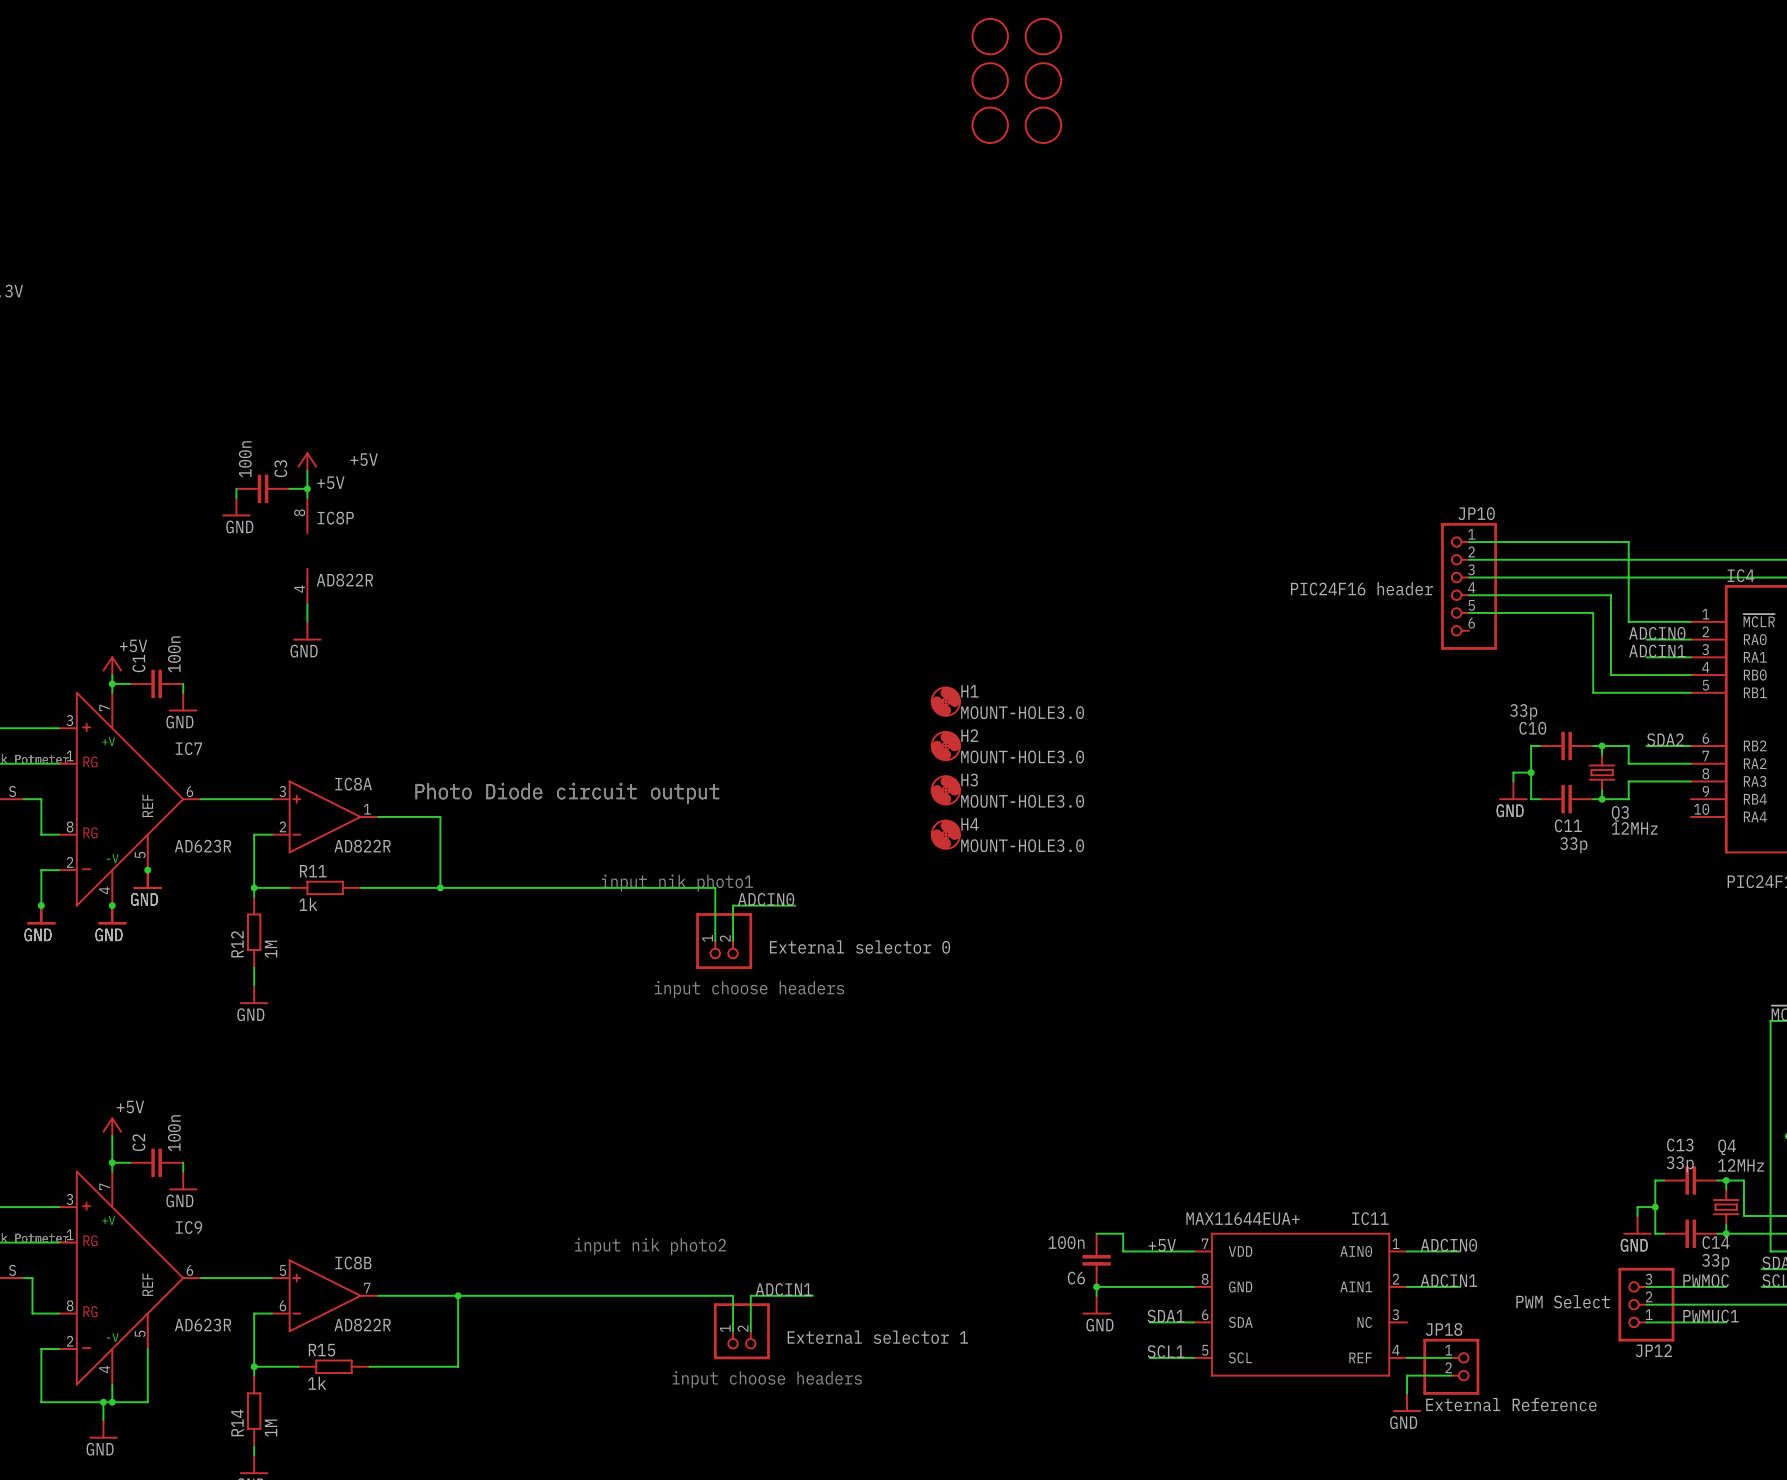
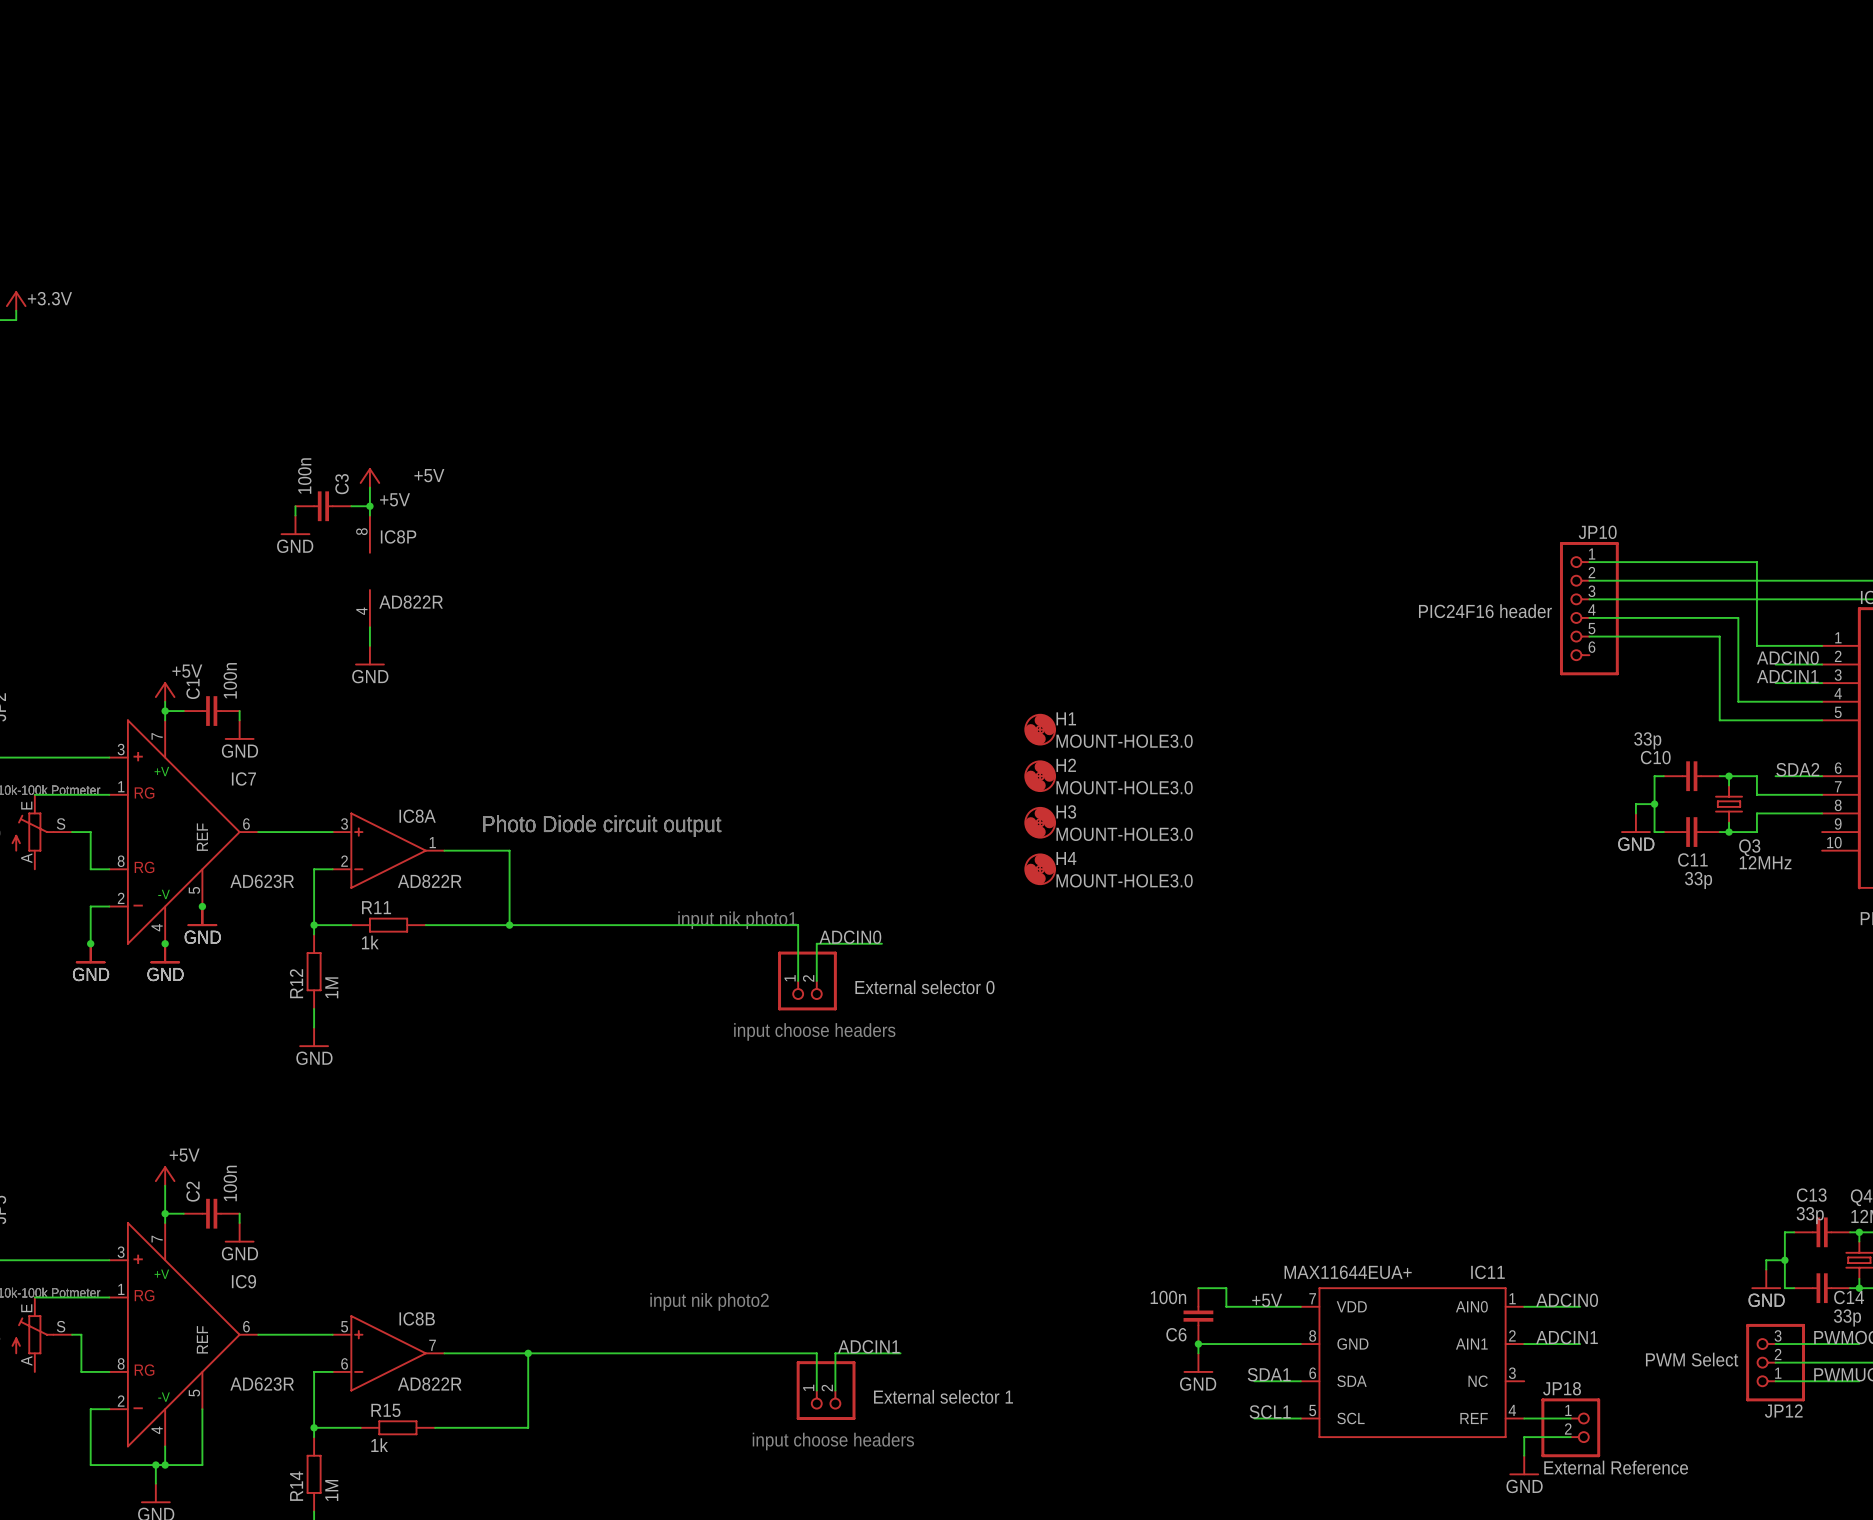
part: (990, 36) -> none
part: (1043, 36) -> none
part: (990, 80) -> none
part: (1043, 80) -> none
part: (990, 125) -> none
part: (1043, 125) -> none

